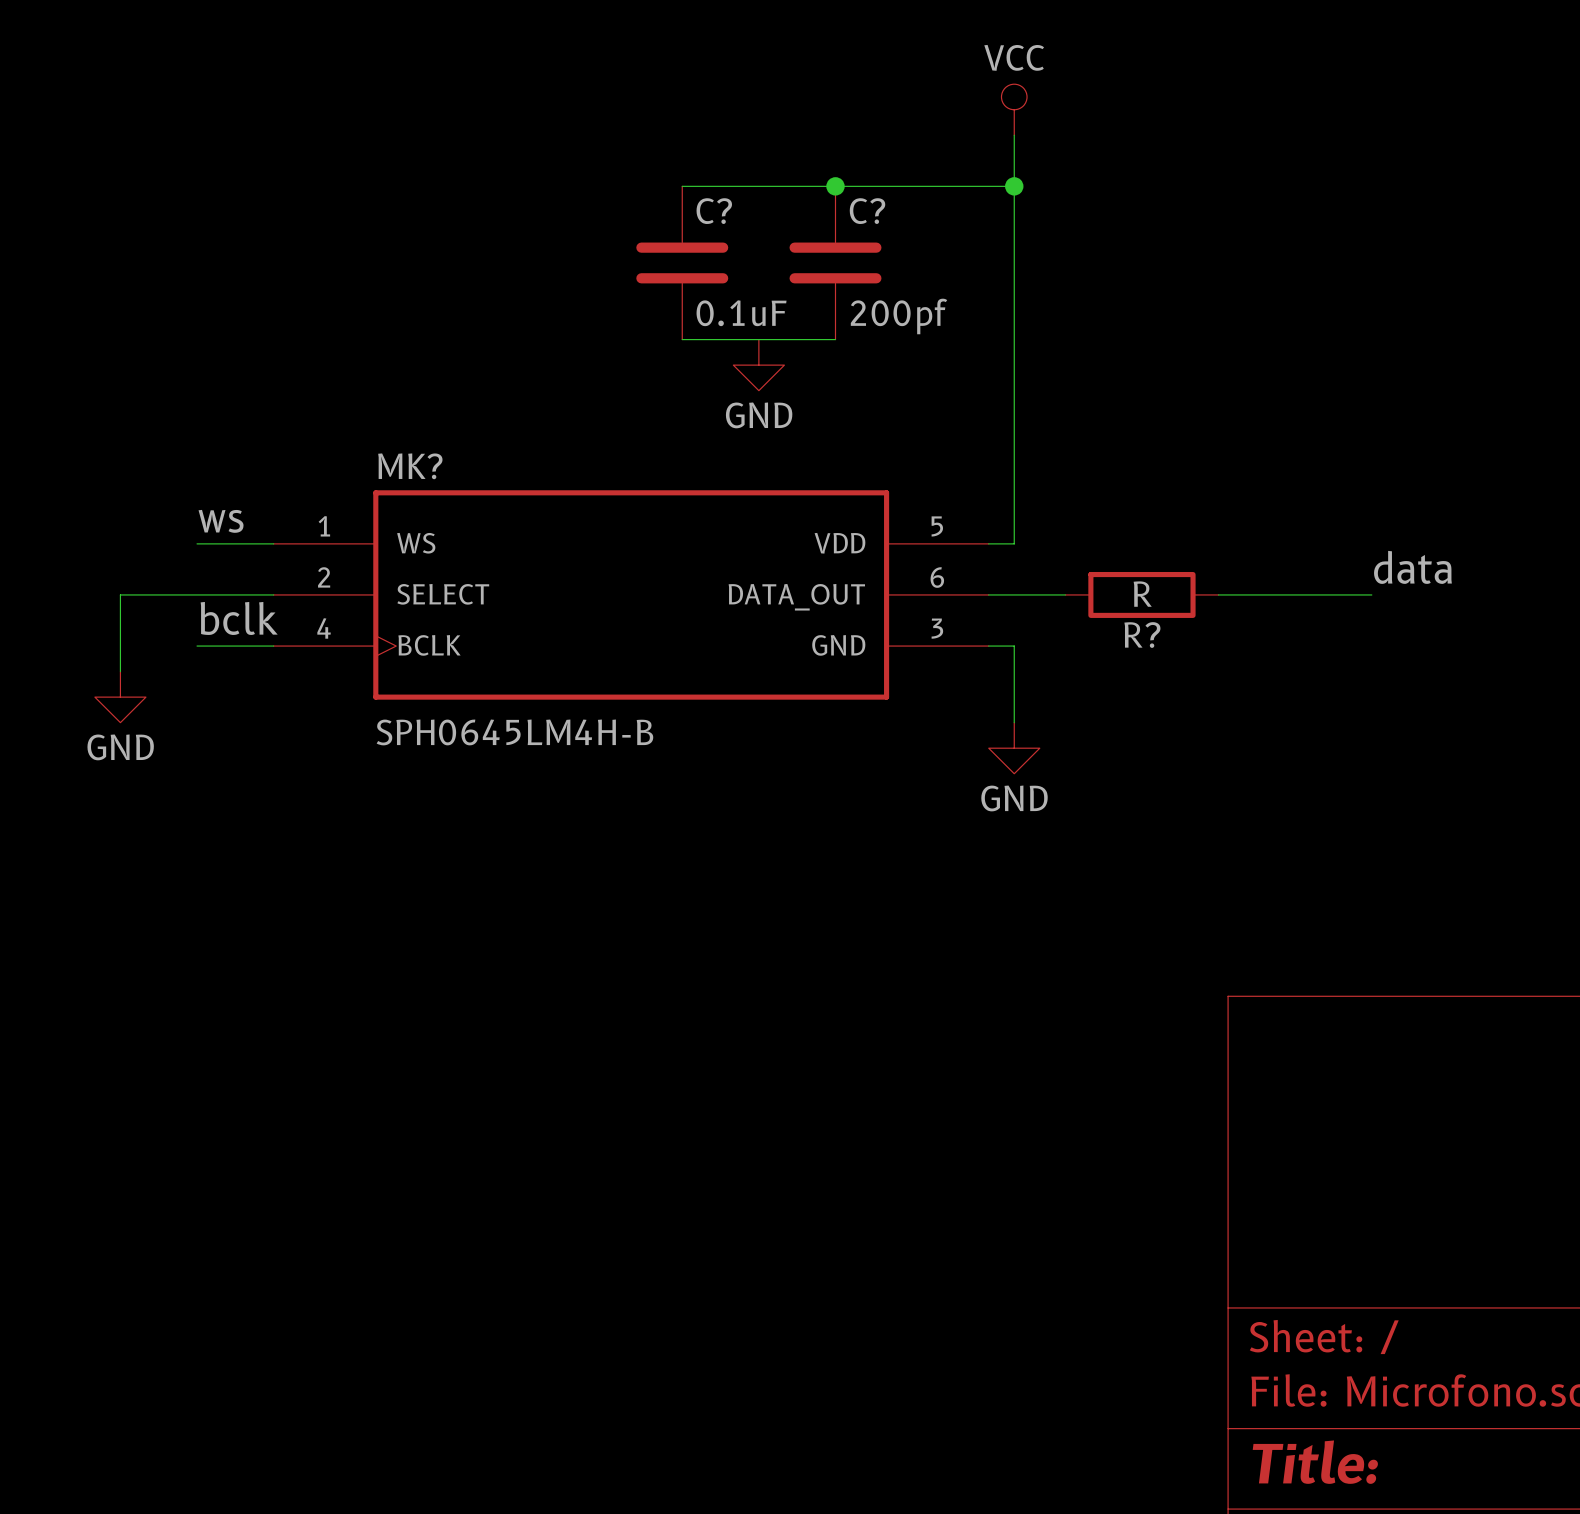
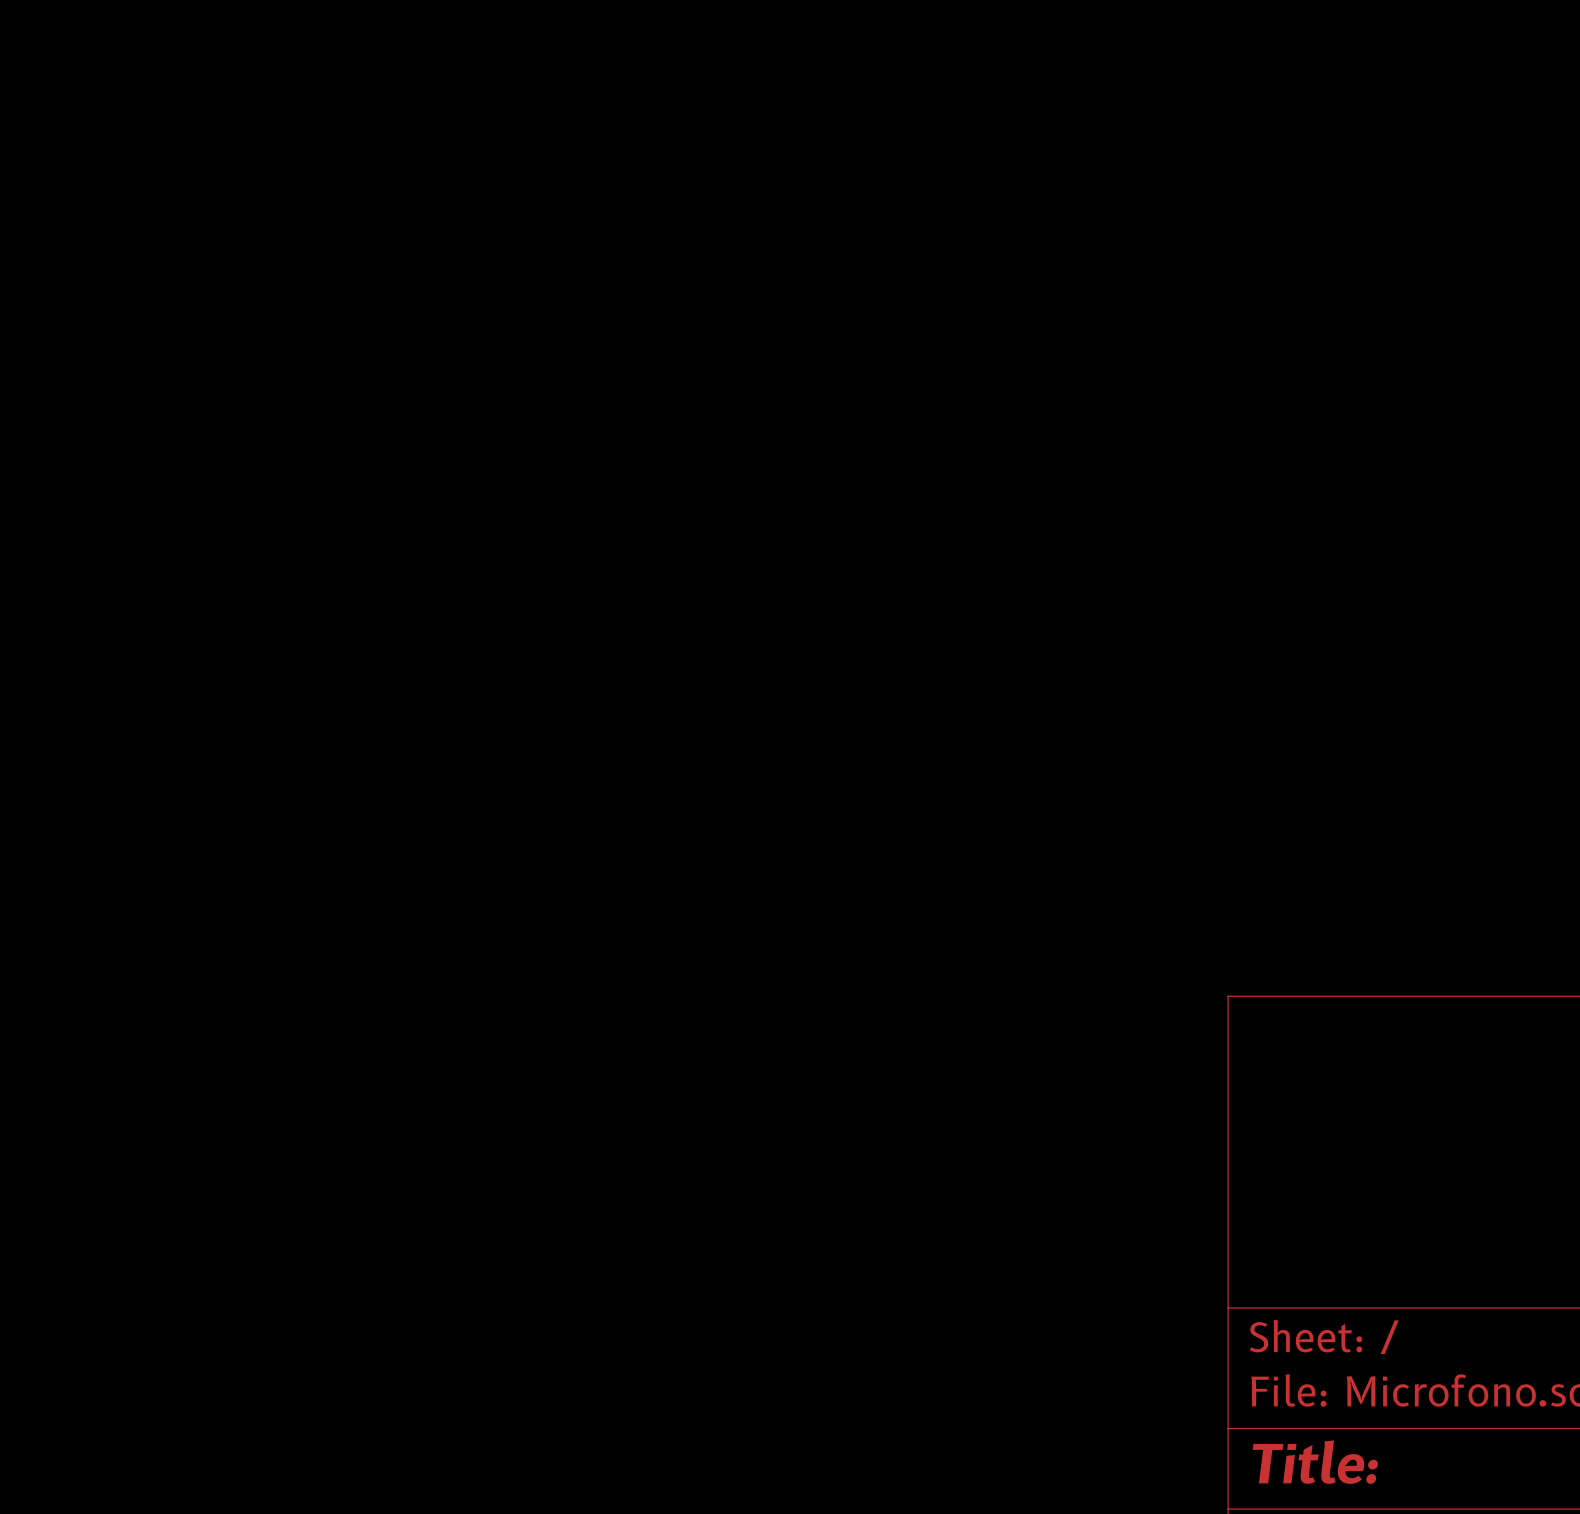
power symbol: VCC (1014, 109) -> none
wire: (1014, 135) (1014, 543) (988, 543) -> none
wire: (682, 186) (1014, 186) -> none
junction: (835, 186) -> none
junction: (1014, 186) -> none
C?: 0.1uF (682, 262) -> none
C?: 200pf (835, 262) -> none
wire: (682, 339) (835, 339) -> none
power symbol: GND (758, 365) -> none
label: ws (221, 521) -> none
wire: (197, 543) (273, 543) -> none
label: data (1412, 567) -> none
wire: (273, 594) (120, 594) (120, 671) -> none
MK?: SPH0645LM4H-B (631, 594) -> none
wire: (988, 594) (1065, 594) -> none
R?: R (1141, 594) -> none
wire: (1218, 594) (1371, 594) -> none
label: bclk (239, 618) -> none
wire: (197, 646) (273, 646) -> none
wire: (988, 646) (1014, 646) (1014, 722) -> none
power symbol: GND (120, 697) -> none
power symbol: GND (1014, 748) -> none

